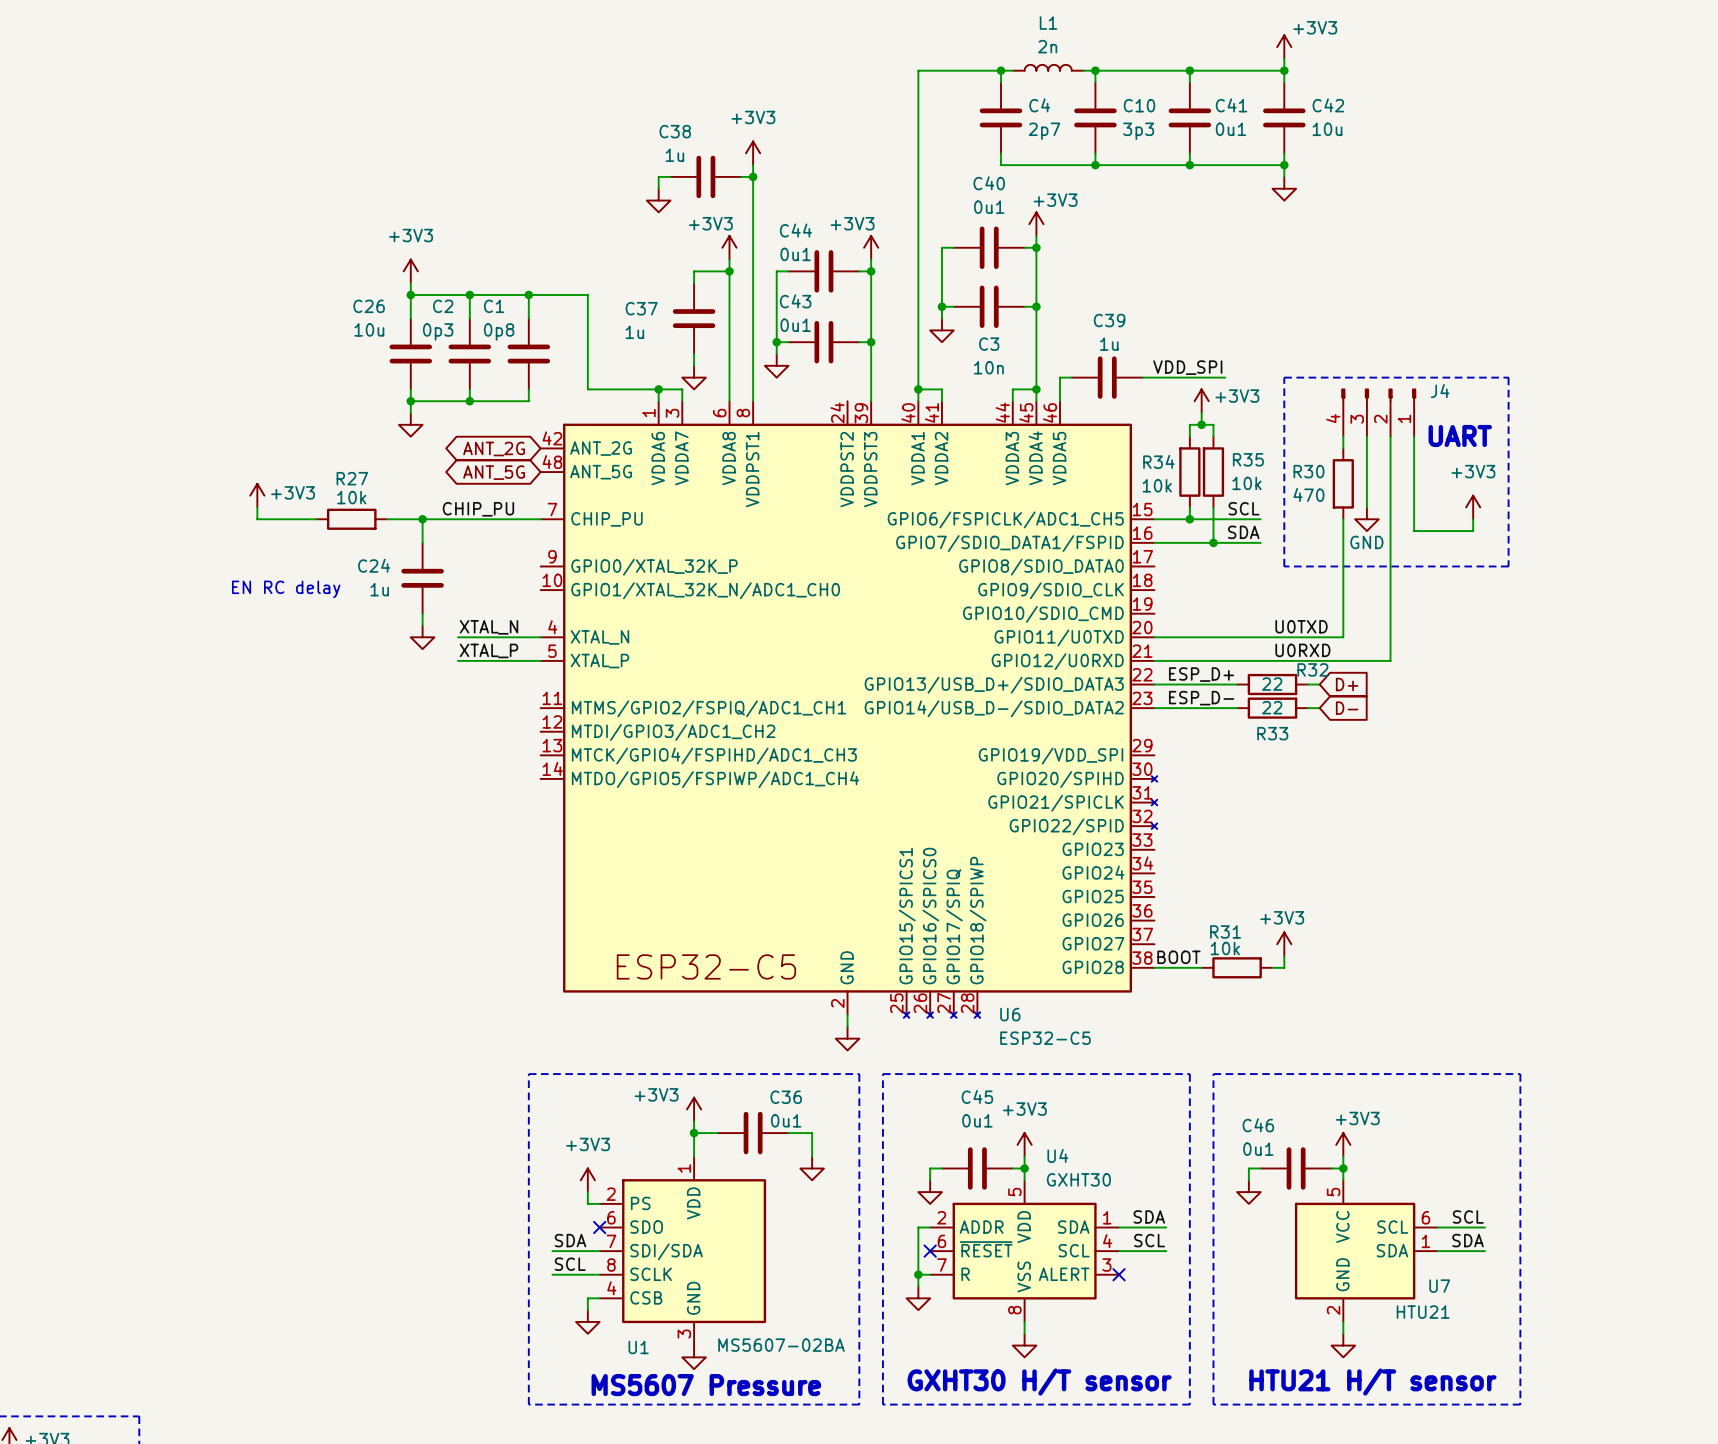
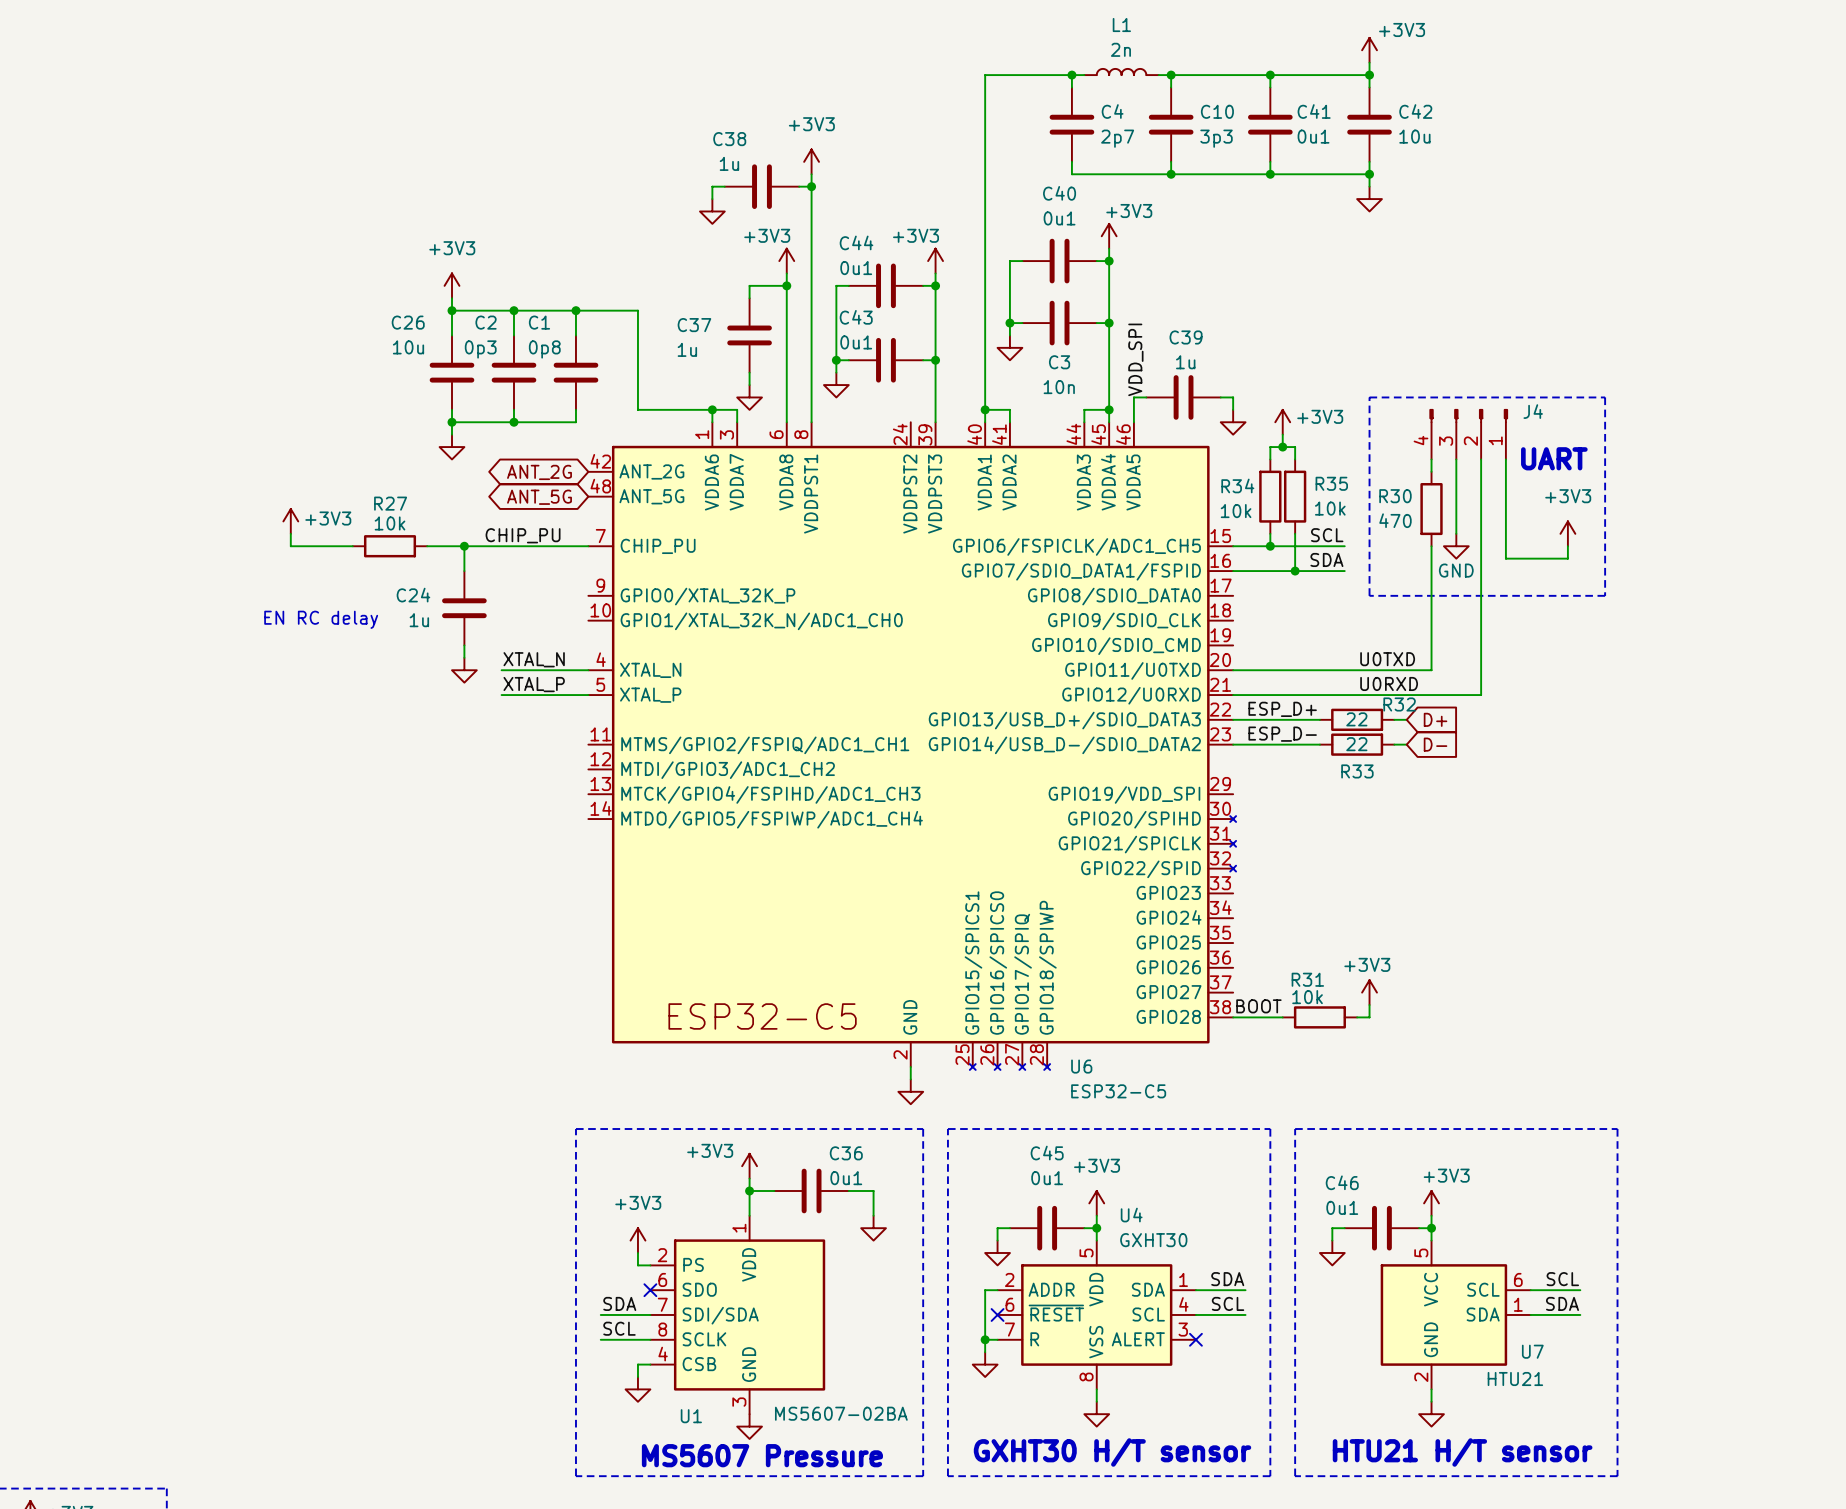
label rotation: 0° (1187, 367) -> 90° counterclockwise (1135, 359)
label position: VDD_SPI (1187, 367) -> VDD_SPI (1135, 359)
wire: (1154, 377) (1225, 377) -> (1233, 397) (1233, 409)
power symbol: none -> (1233, 422)

